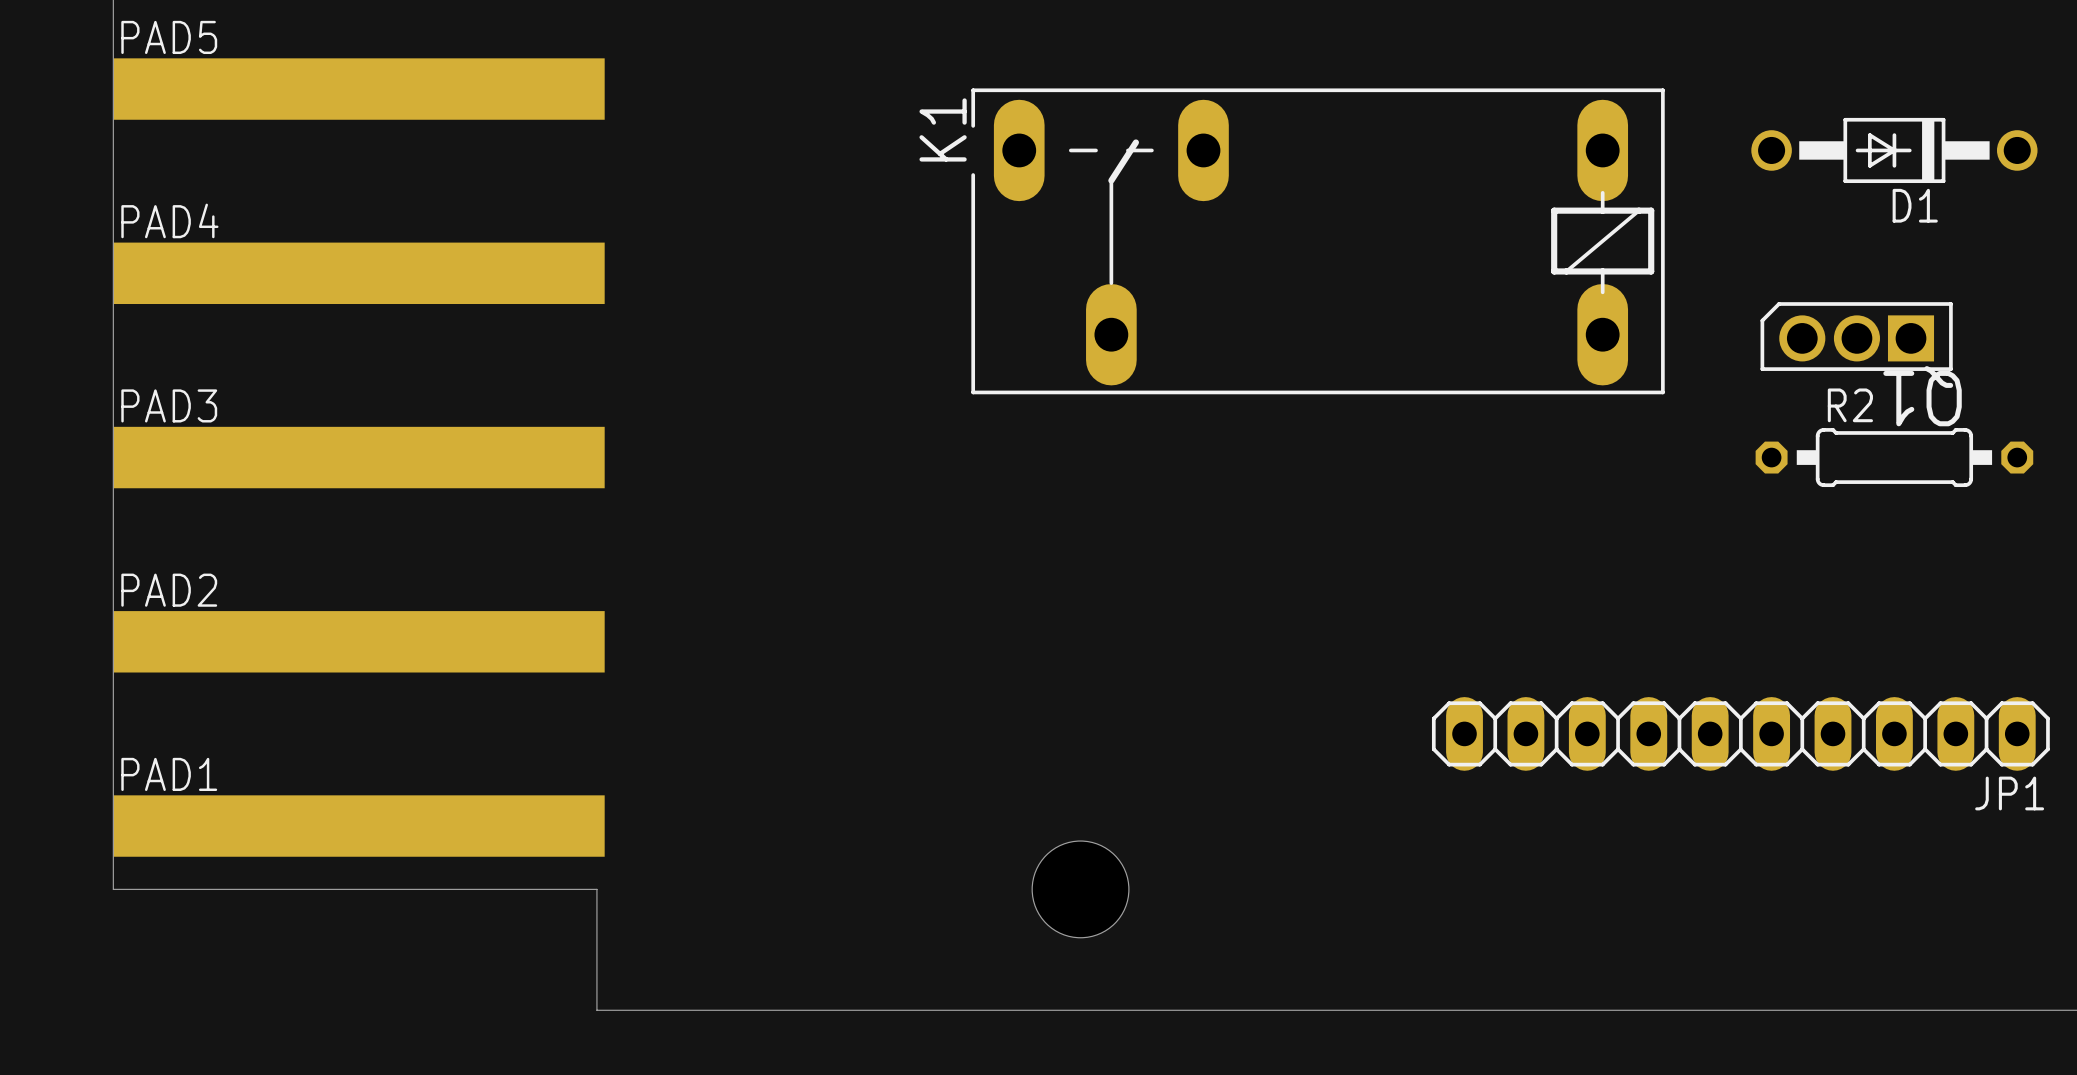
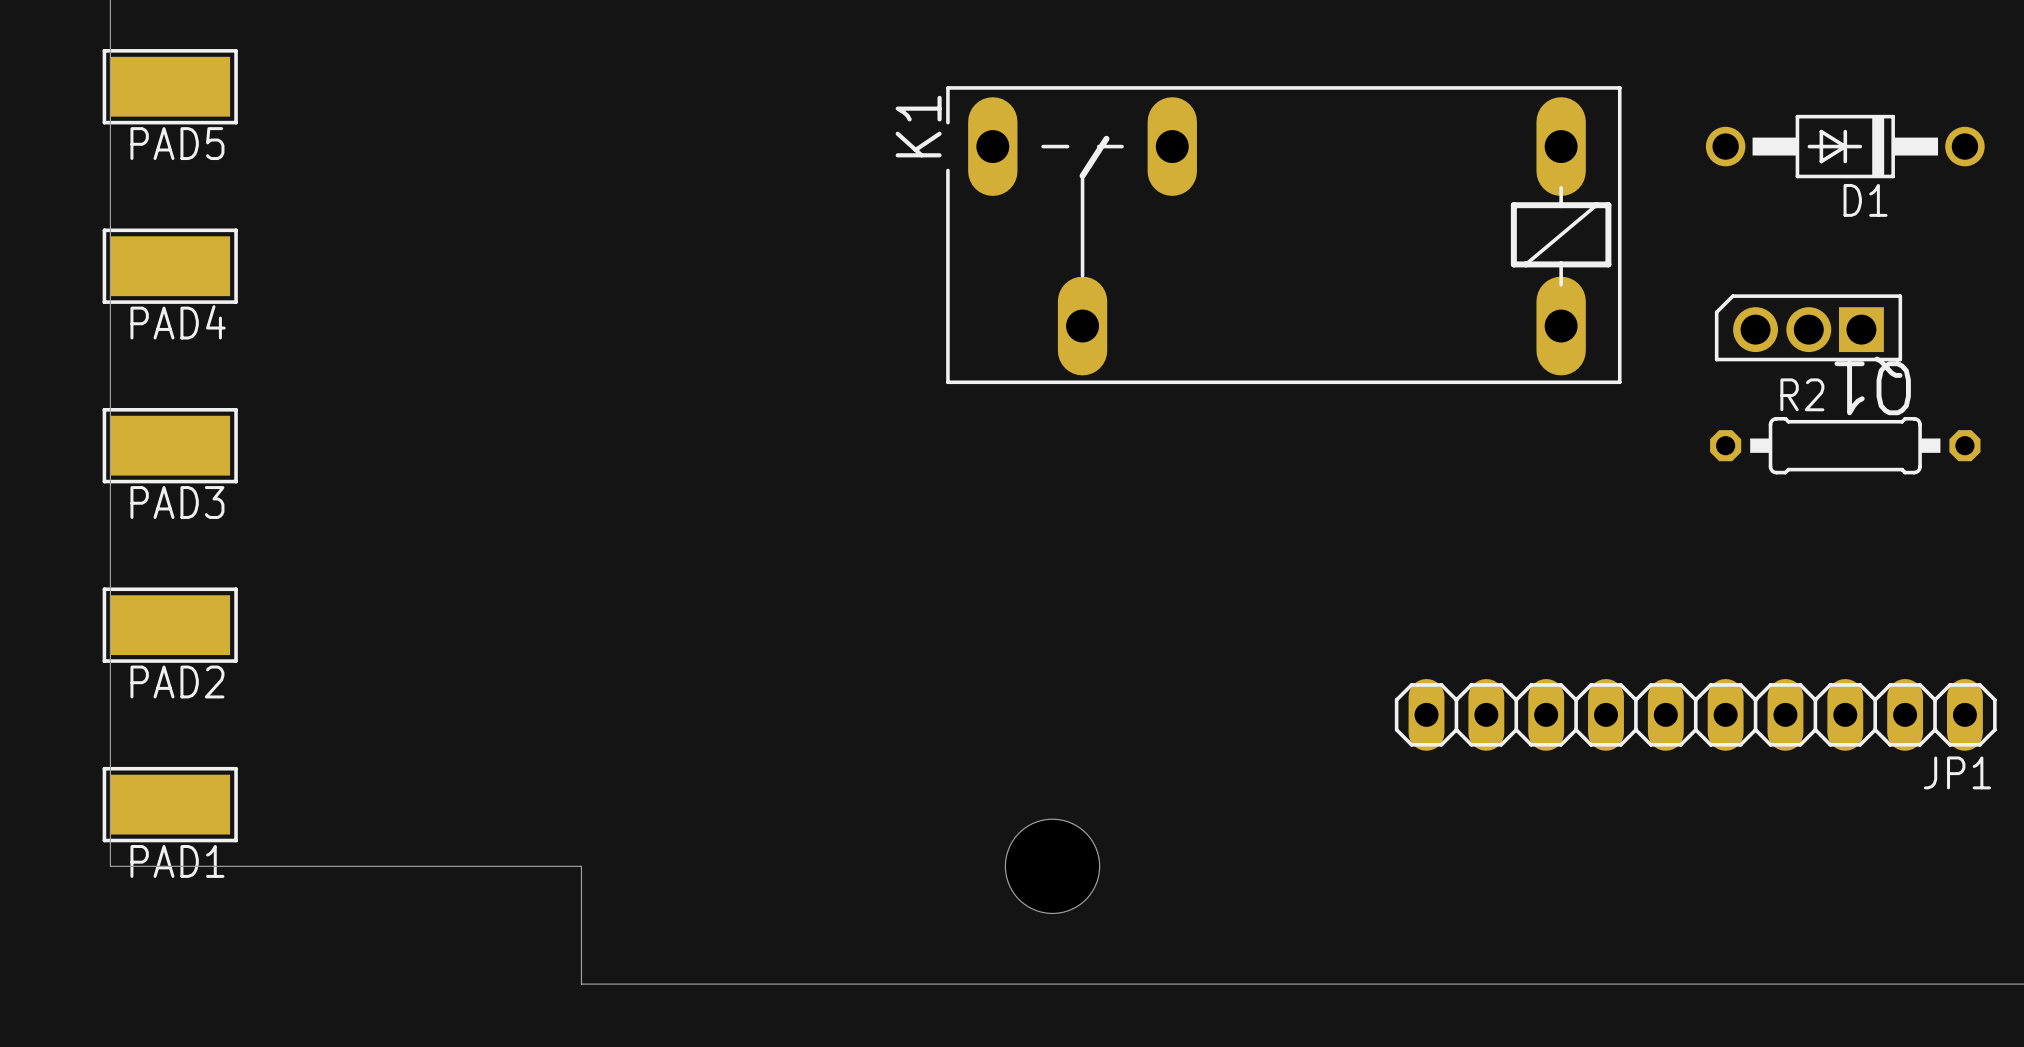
PAD5 name position: PAD5 (169, 37) -> PAD5 (177, 143)
PAD5 footprint: [113, 58, 605, 120] -> [102, 49, 238, 125]
PAD4 name position: PAD4 (169, 220) -> PAD4 (178, 322)
PAD4 footprint: [113, 242, 605, 305] -> [102, 228, 238, 304]
PAD3 name position: PAD3 (169, 405) -> PAD3 (177, 502)
PAD3 footprint: [113, 426, 605, 489] -> [102, 407, 238, 484]
PAD2 name position: PAD2 (169, 590) -> PAD2 (177, 681)
PAD2 footprint: [113, 611, 605, 673] -> [102, 587, 238, 663]
PAD1 name position: PAD1 (169, 774) -> PAD1 (177, 861)
PAD1 footprint: [113, 795, 605, 857] -> [102, 766, 238, 843]

